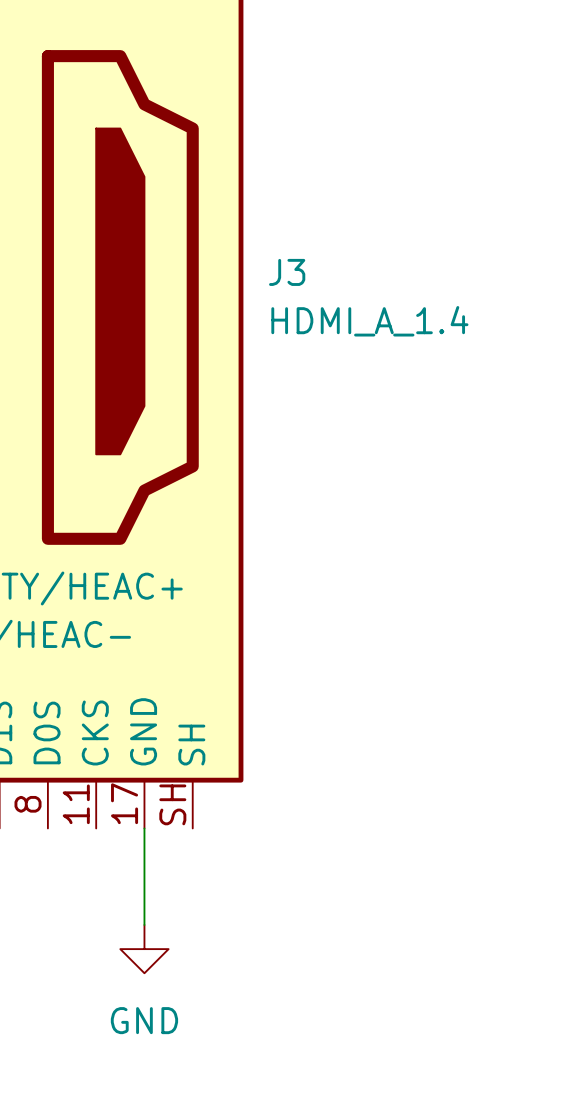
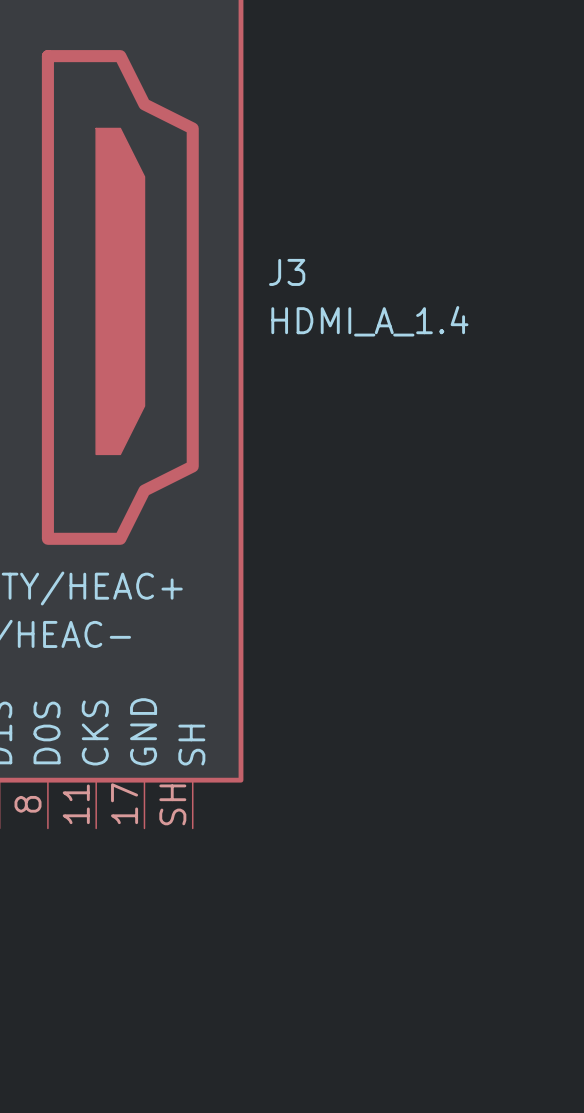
wire: (144, 828) (144, 924) -> none
power symbol: GND (144, 949) -> none

